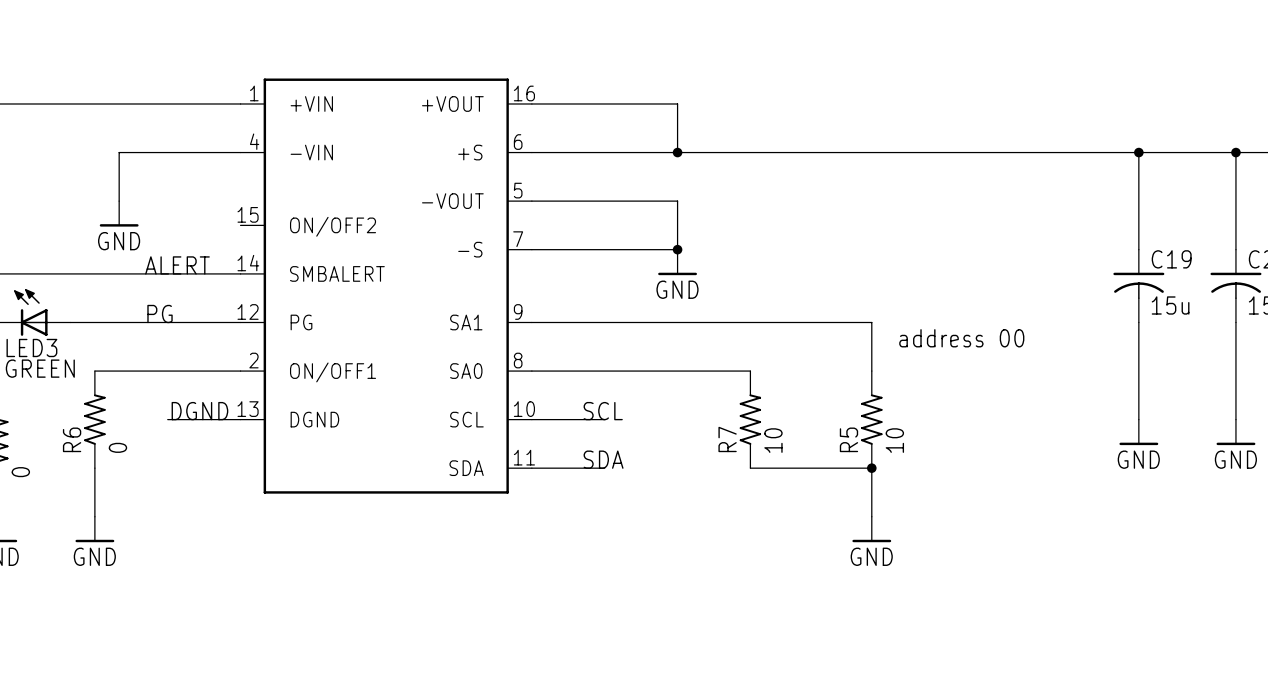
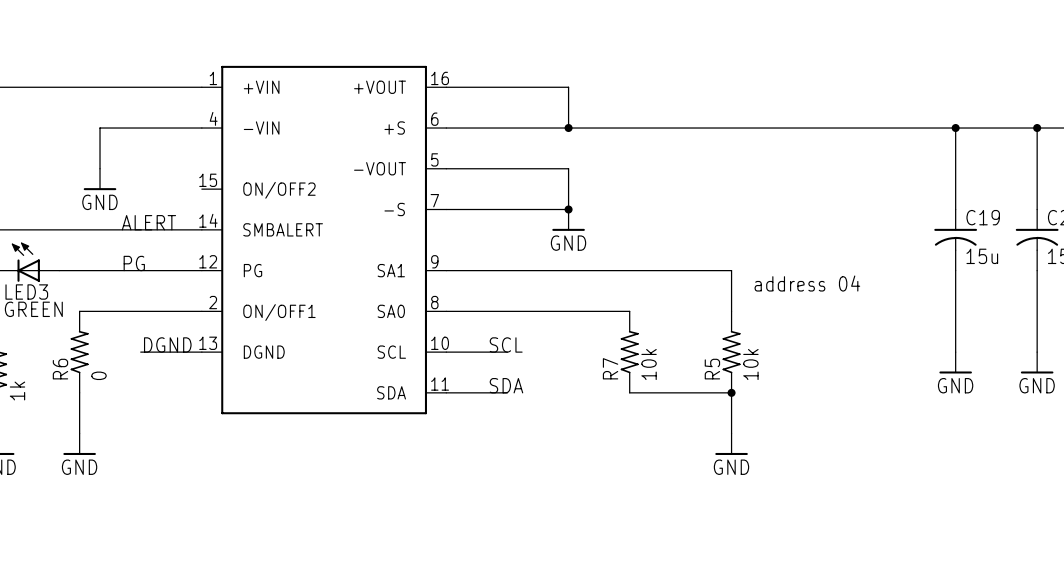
text: address 00 (961, 338) -> address 04 (807, 283)
R7 value: 10 (773, 440) -> 10k (649, 364)
R5 value: 10 (894, 440) -> 10k (750, 364)
part value: 0 (20, 472) -> 1k (17, 390)

